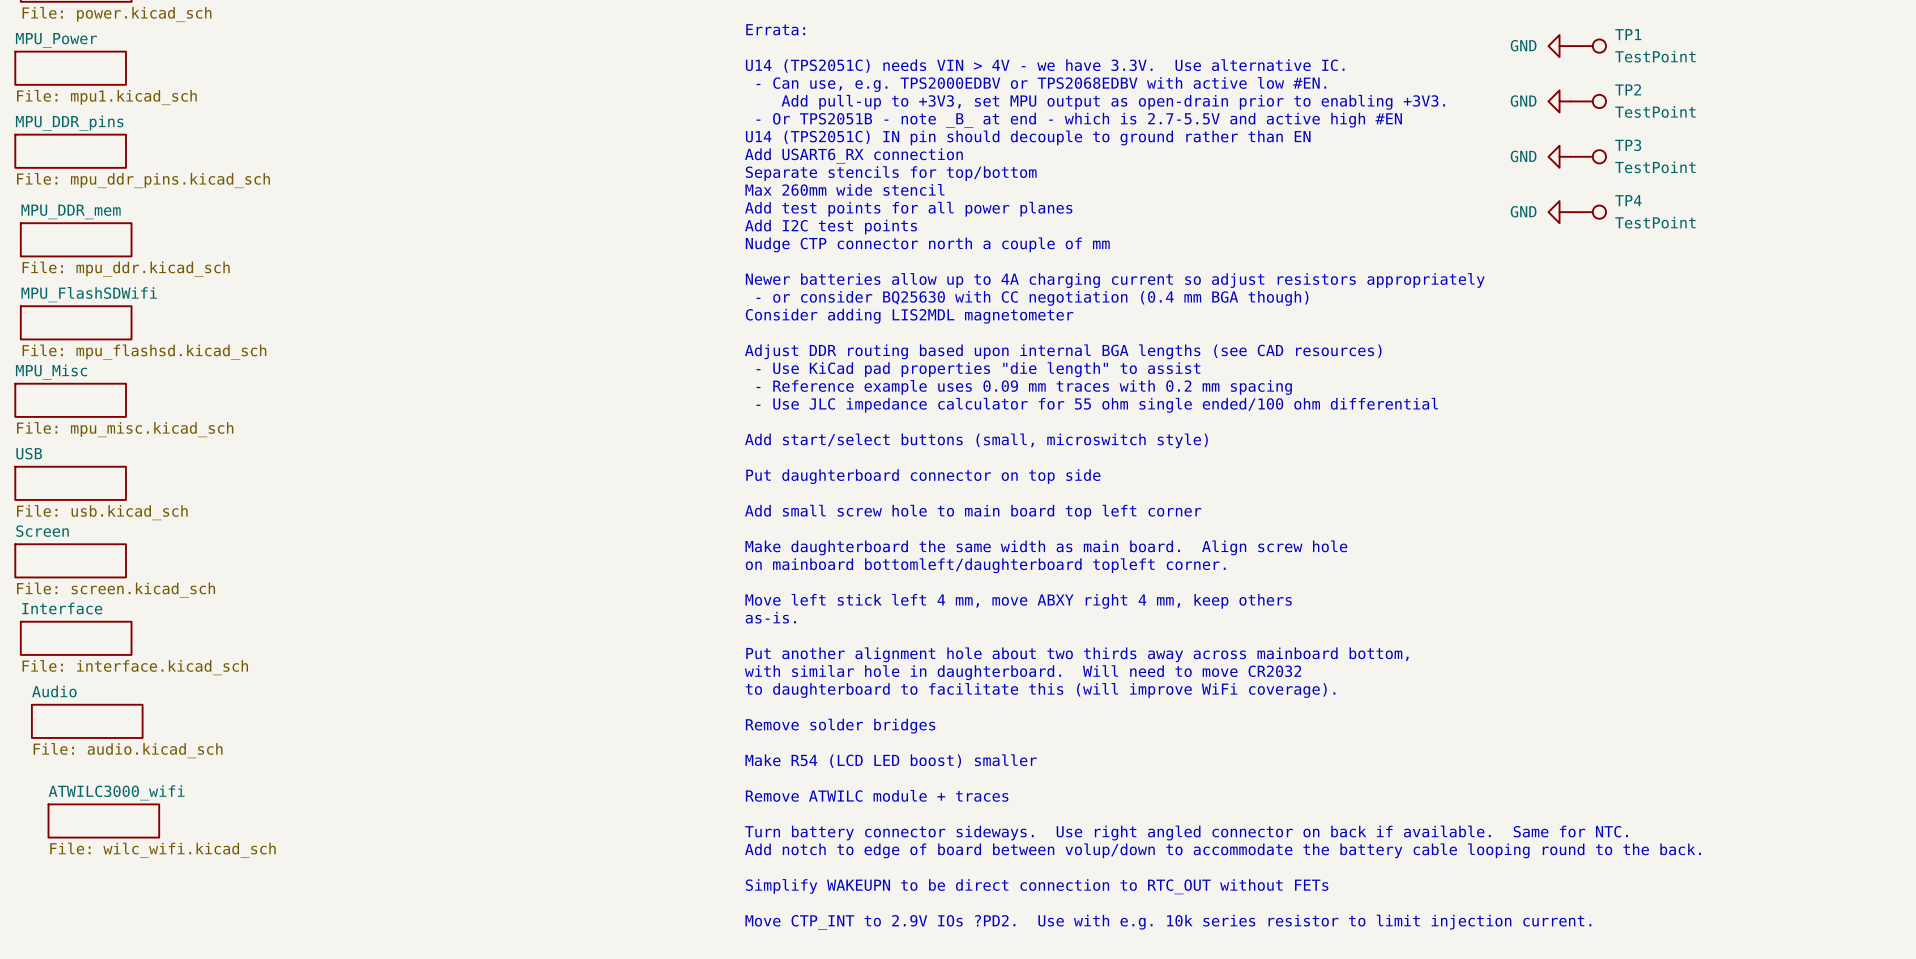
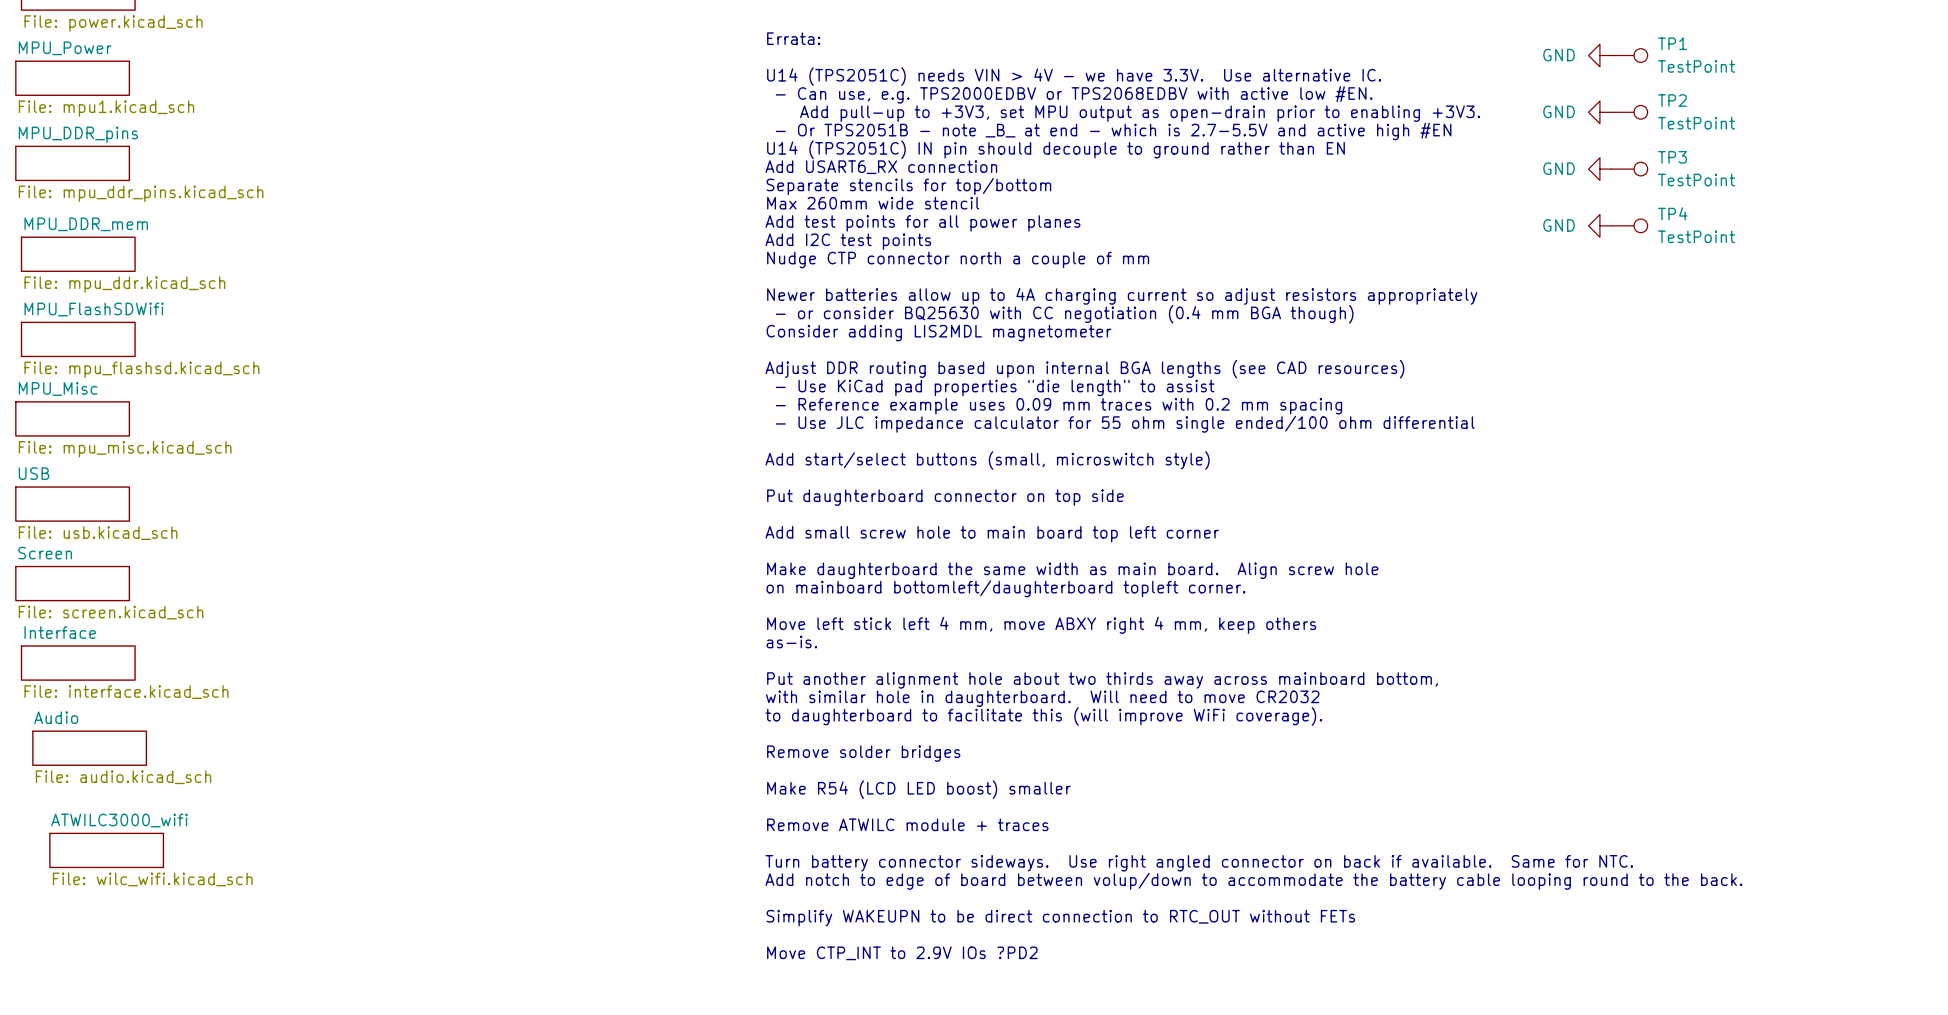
text: Move CTP_INT to 2.9V IOs ?PD2. Use with e.g. 10k series resistor to limit injection current. (1168, 922) -> Move CTP_INT to 2.9V IOs ?PD2 (902, 953)

